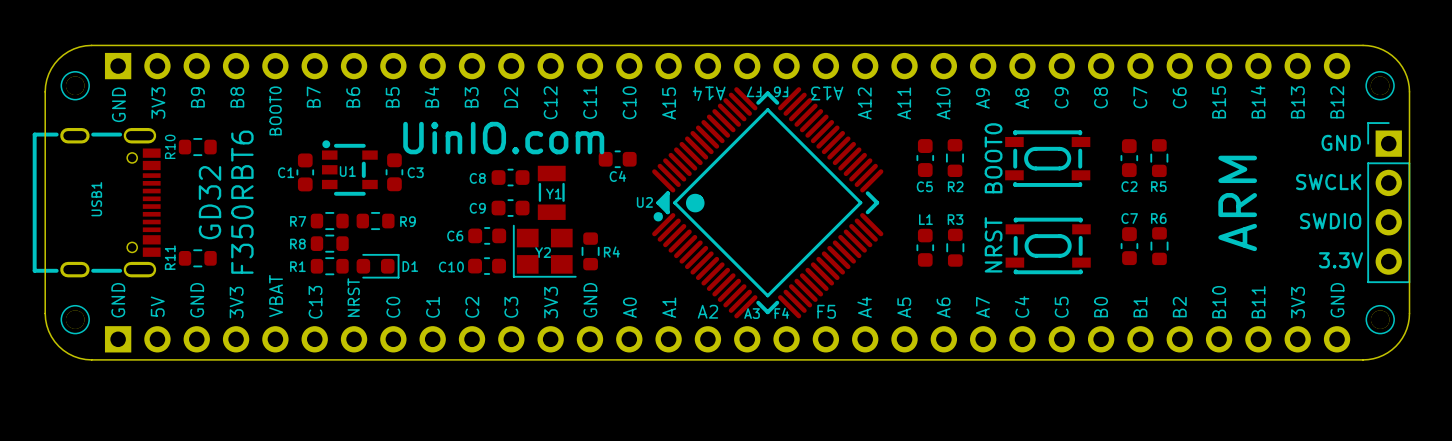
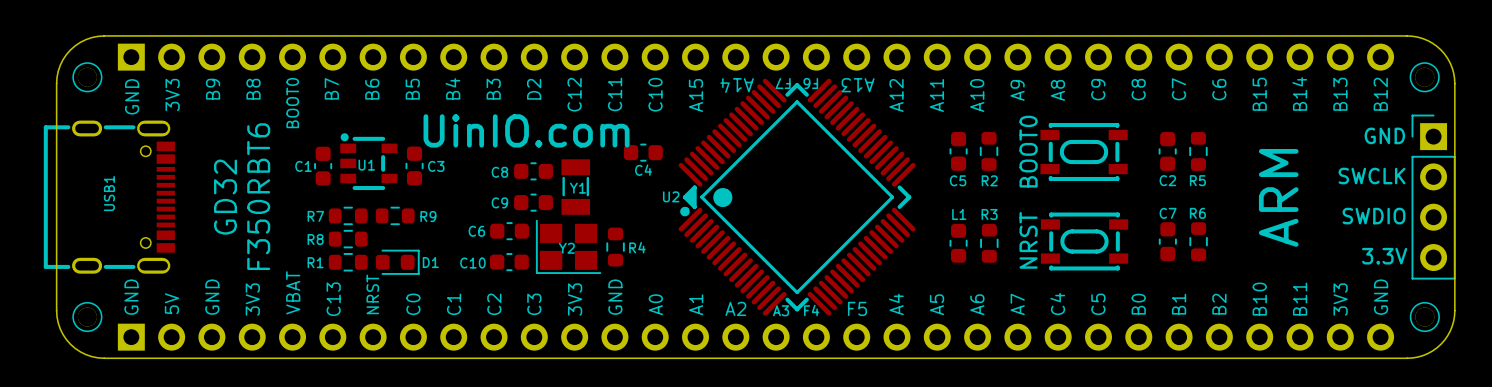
R10: (197, 147) -> none
R11: (197, 258) -> none

